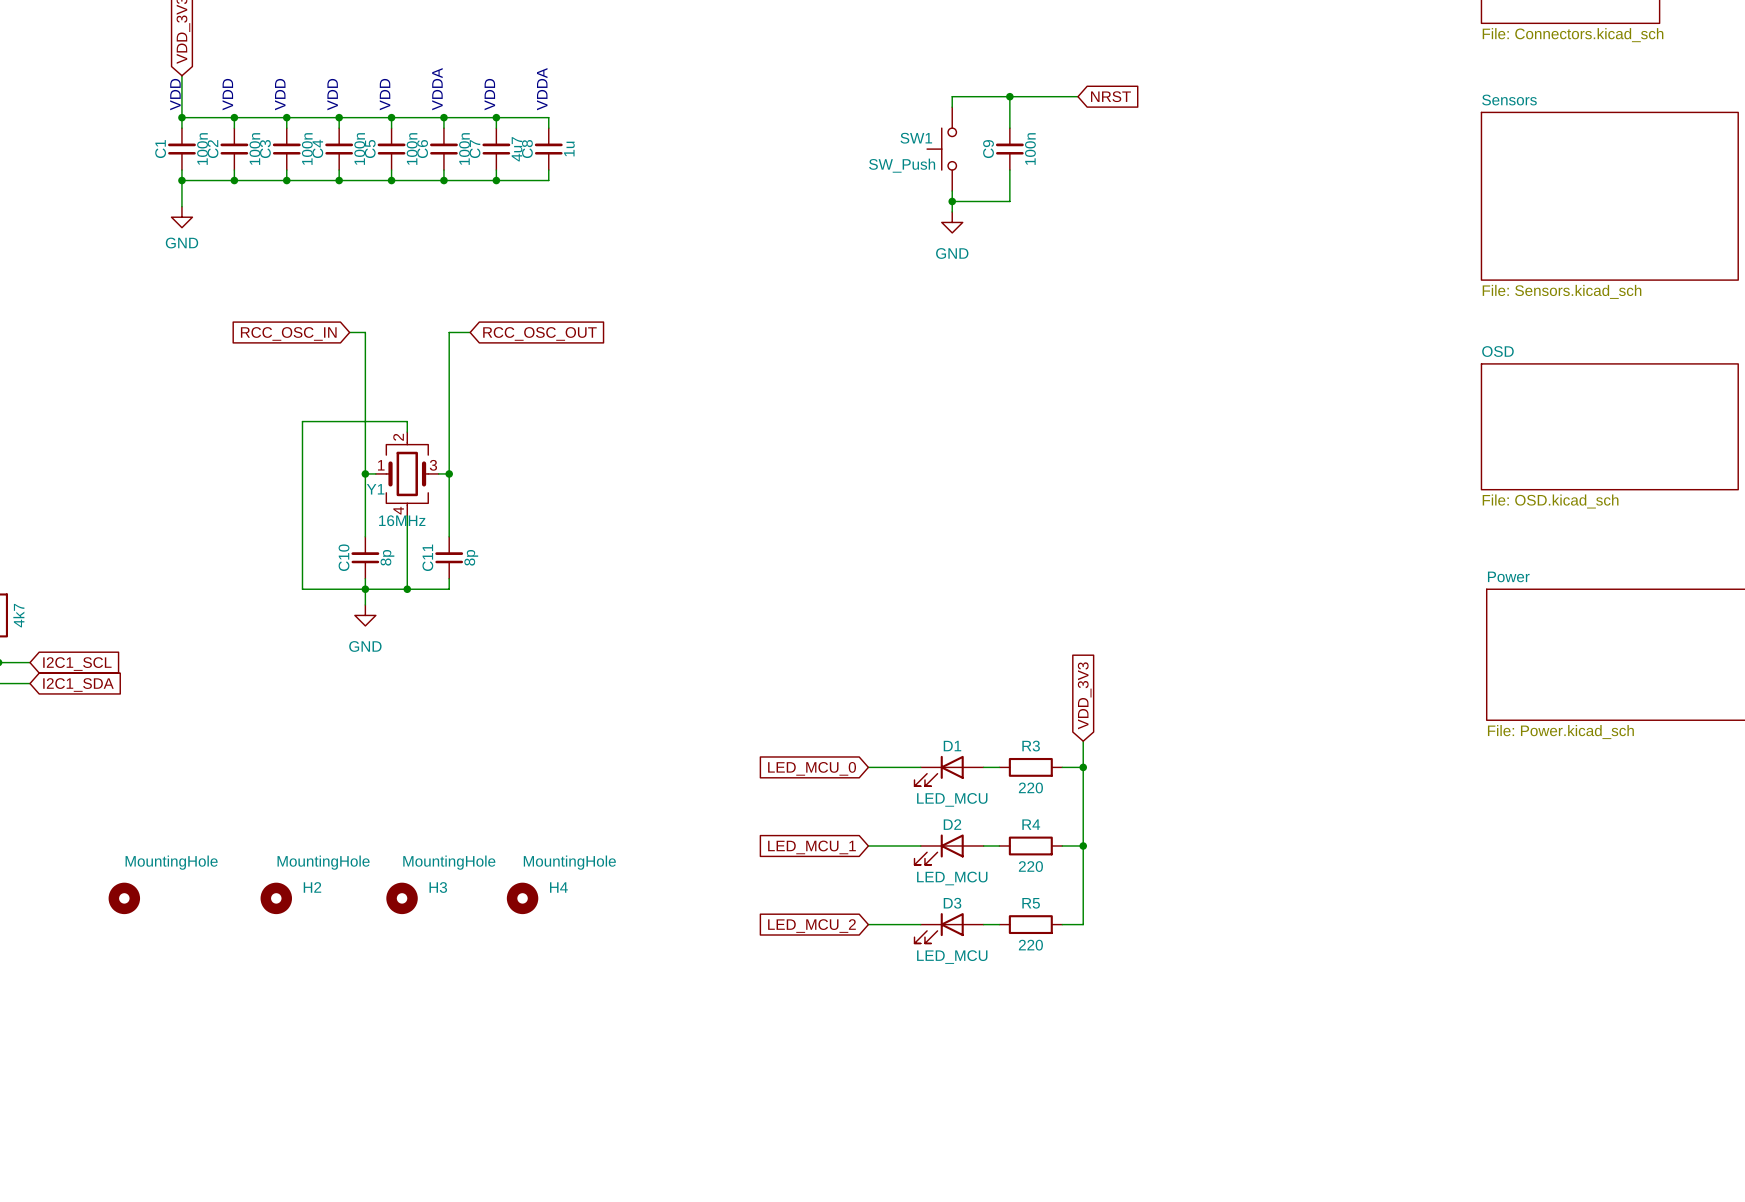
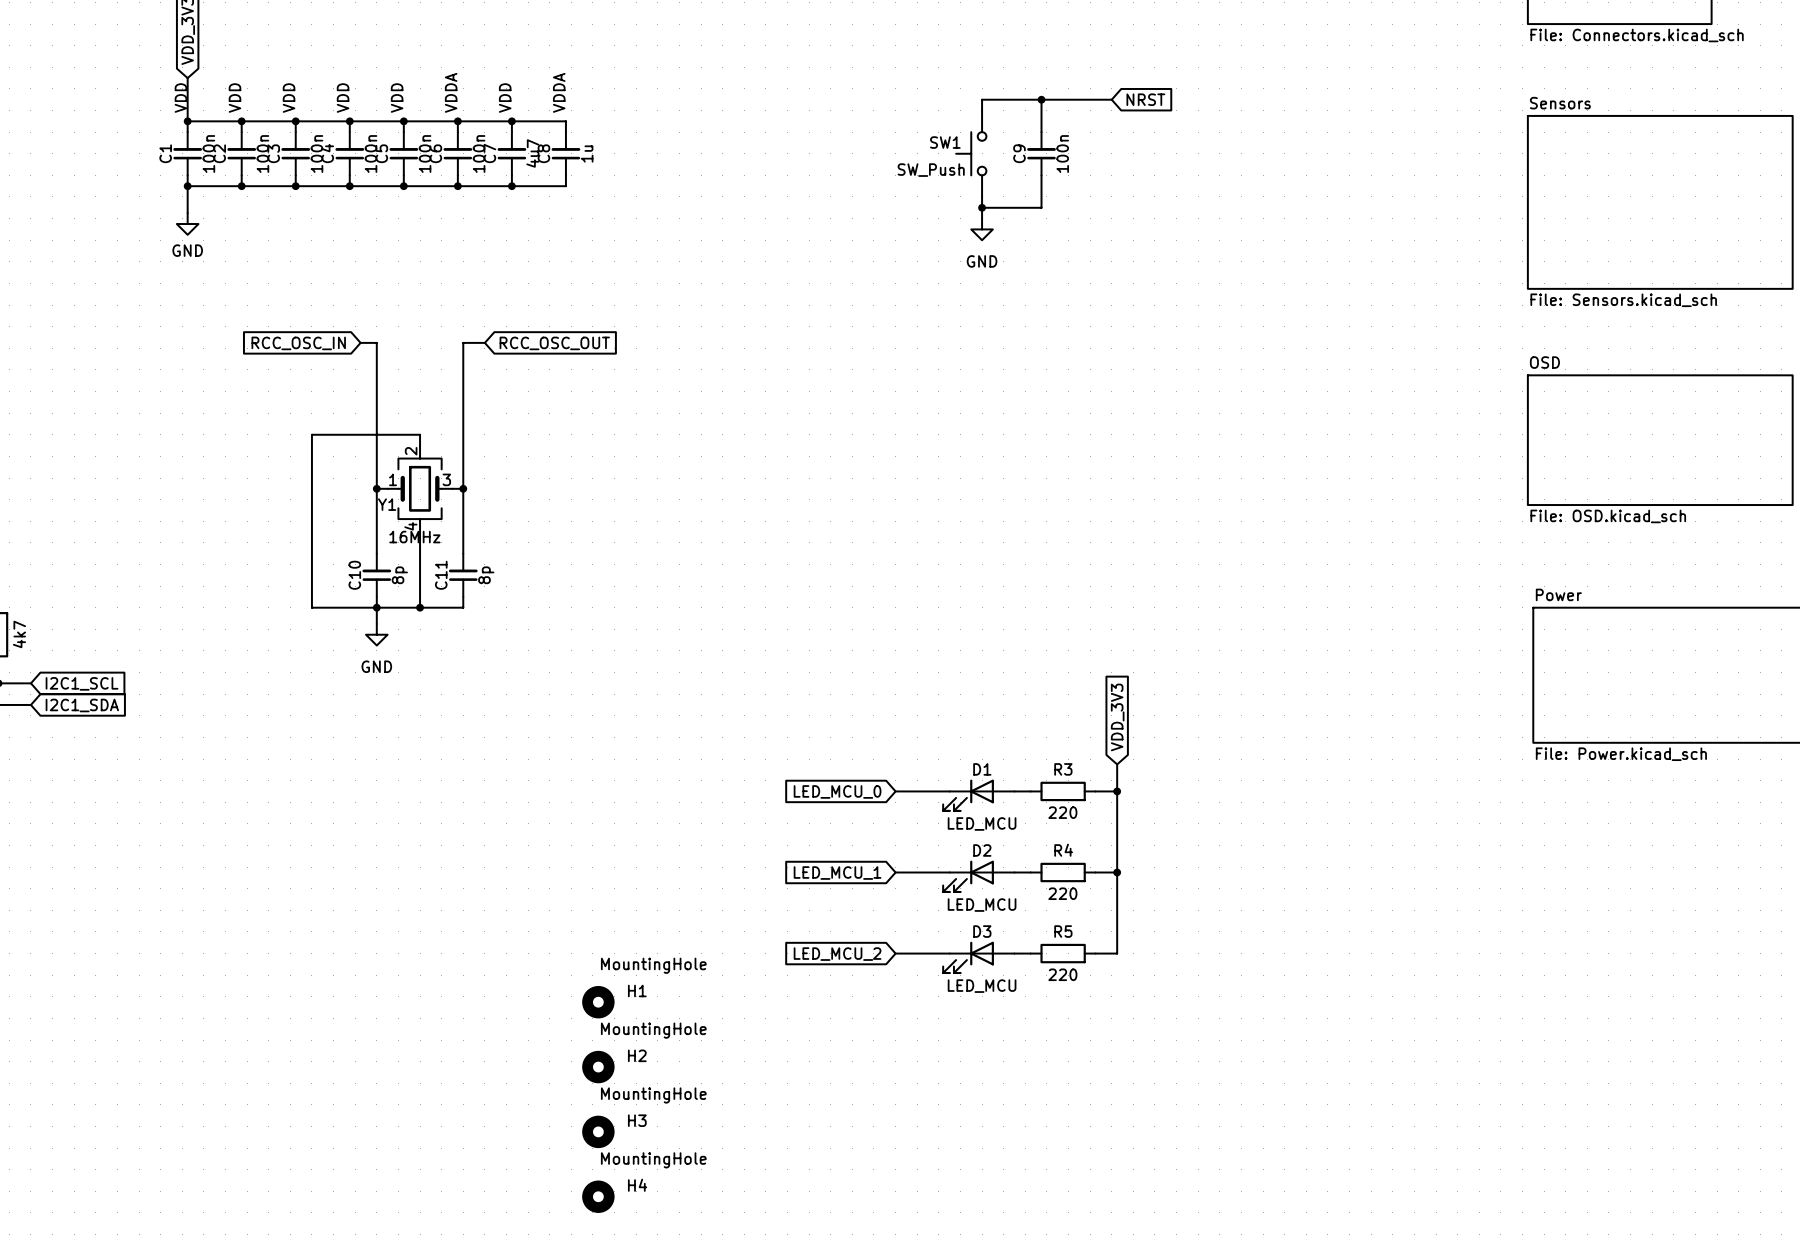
part: MountingHole (124, 898) -> none
H2 position: (276, 898) -> (598, 1067)
H3 position: (402, 898) -> (598, 1131)
H4 position: (522, 898) -> (598, 1196)
H1: none -> MountingHole (598, 1002)

